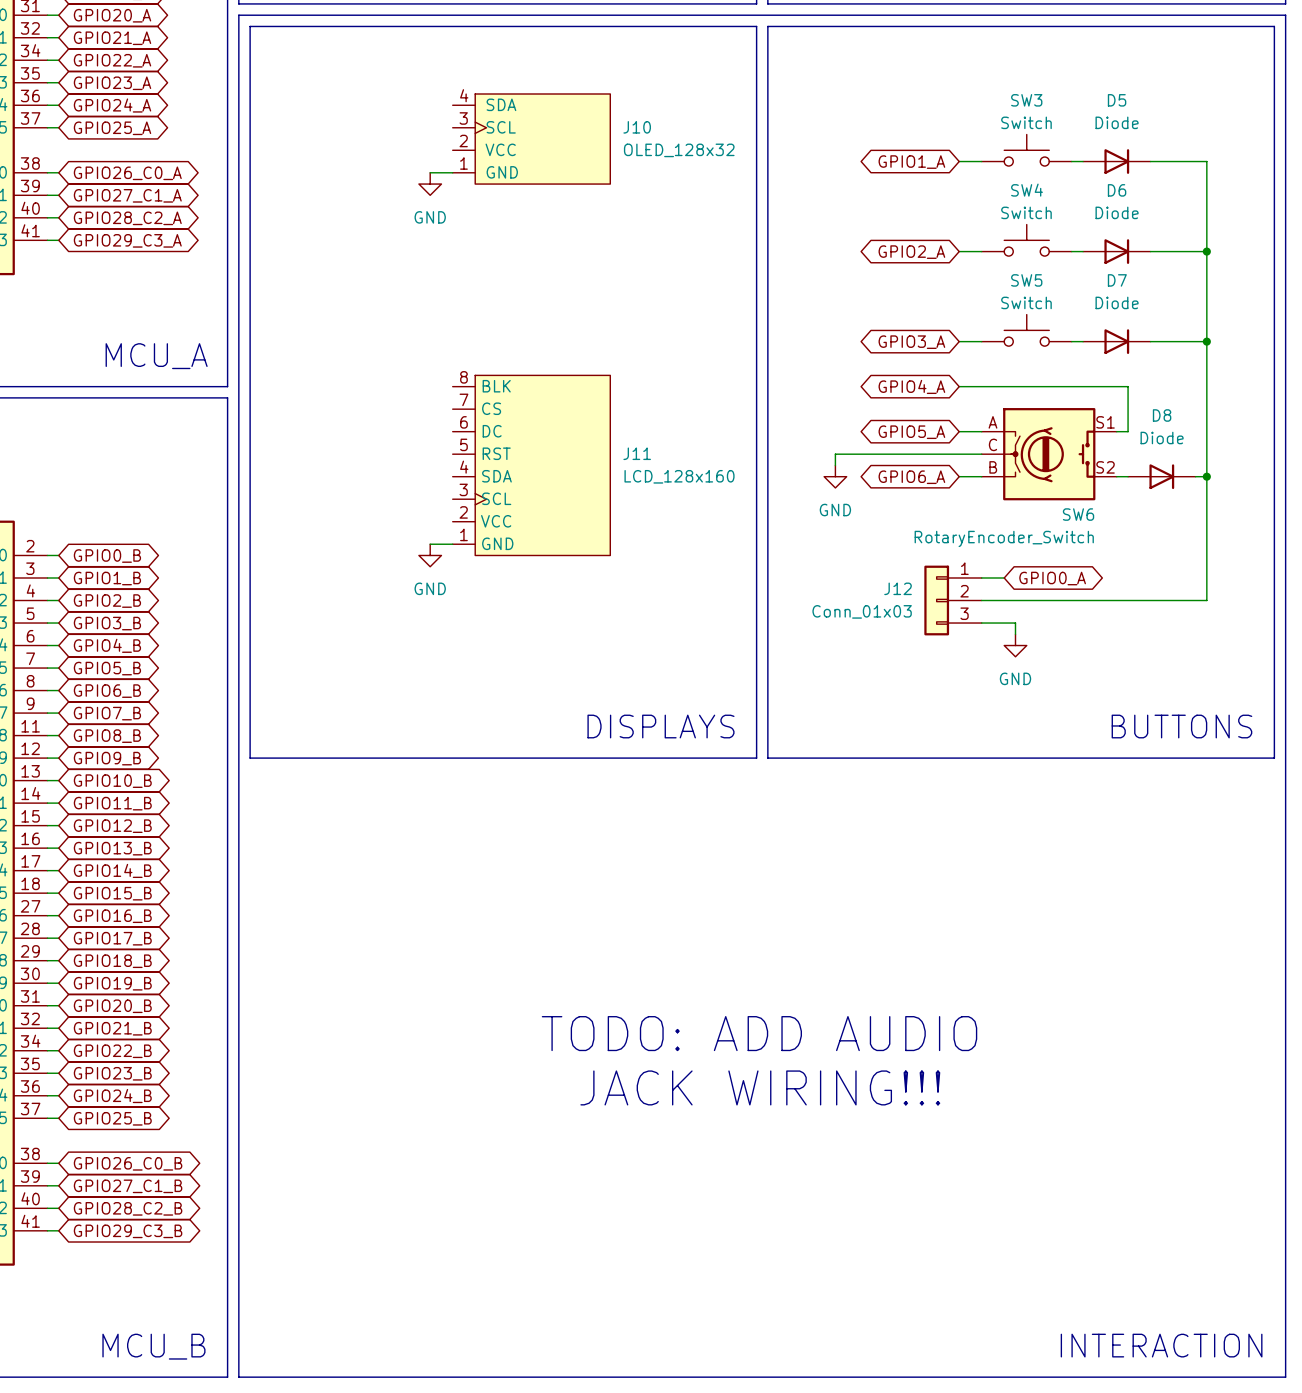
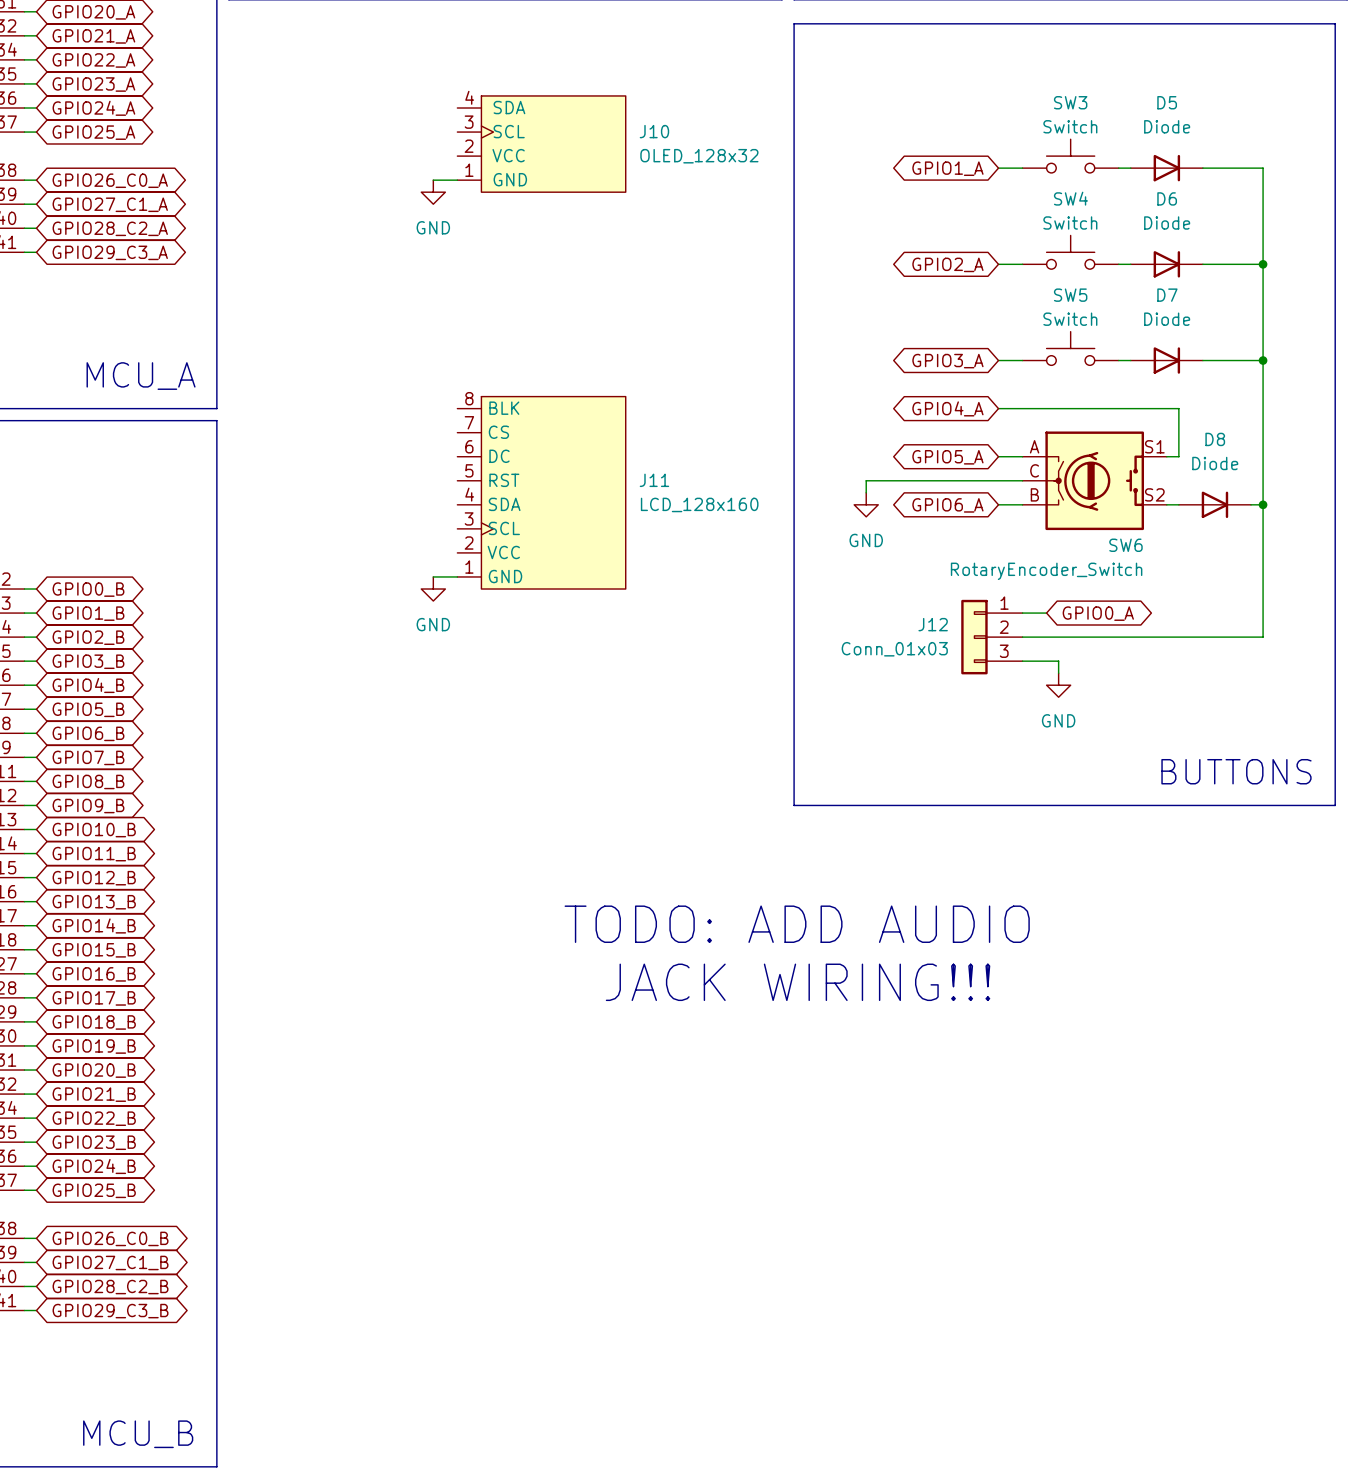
line: (238, 15) (1285, 15) (1285, 1377) (238, 1377) (238, 15) -> none
line: (250, 26) (756, 26) (756, 758) (250, 758) (250, 26) -> none
text: DISPLAYS (660, 726) -> none
text position: TODO: ADD AUDIO (759, 1033) -> TODO: ADD AUDIO (797, 924)
text position: JACK WIRING!!! (760, 1087) -> JACK WIRING!!! (798, 982)
text: INTERACTION (1161, 1345) -> none

